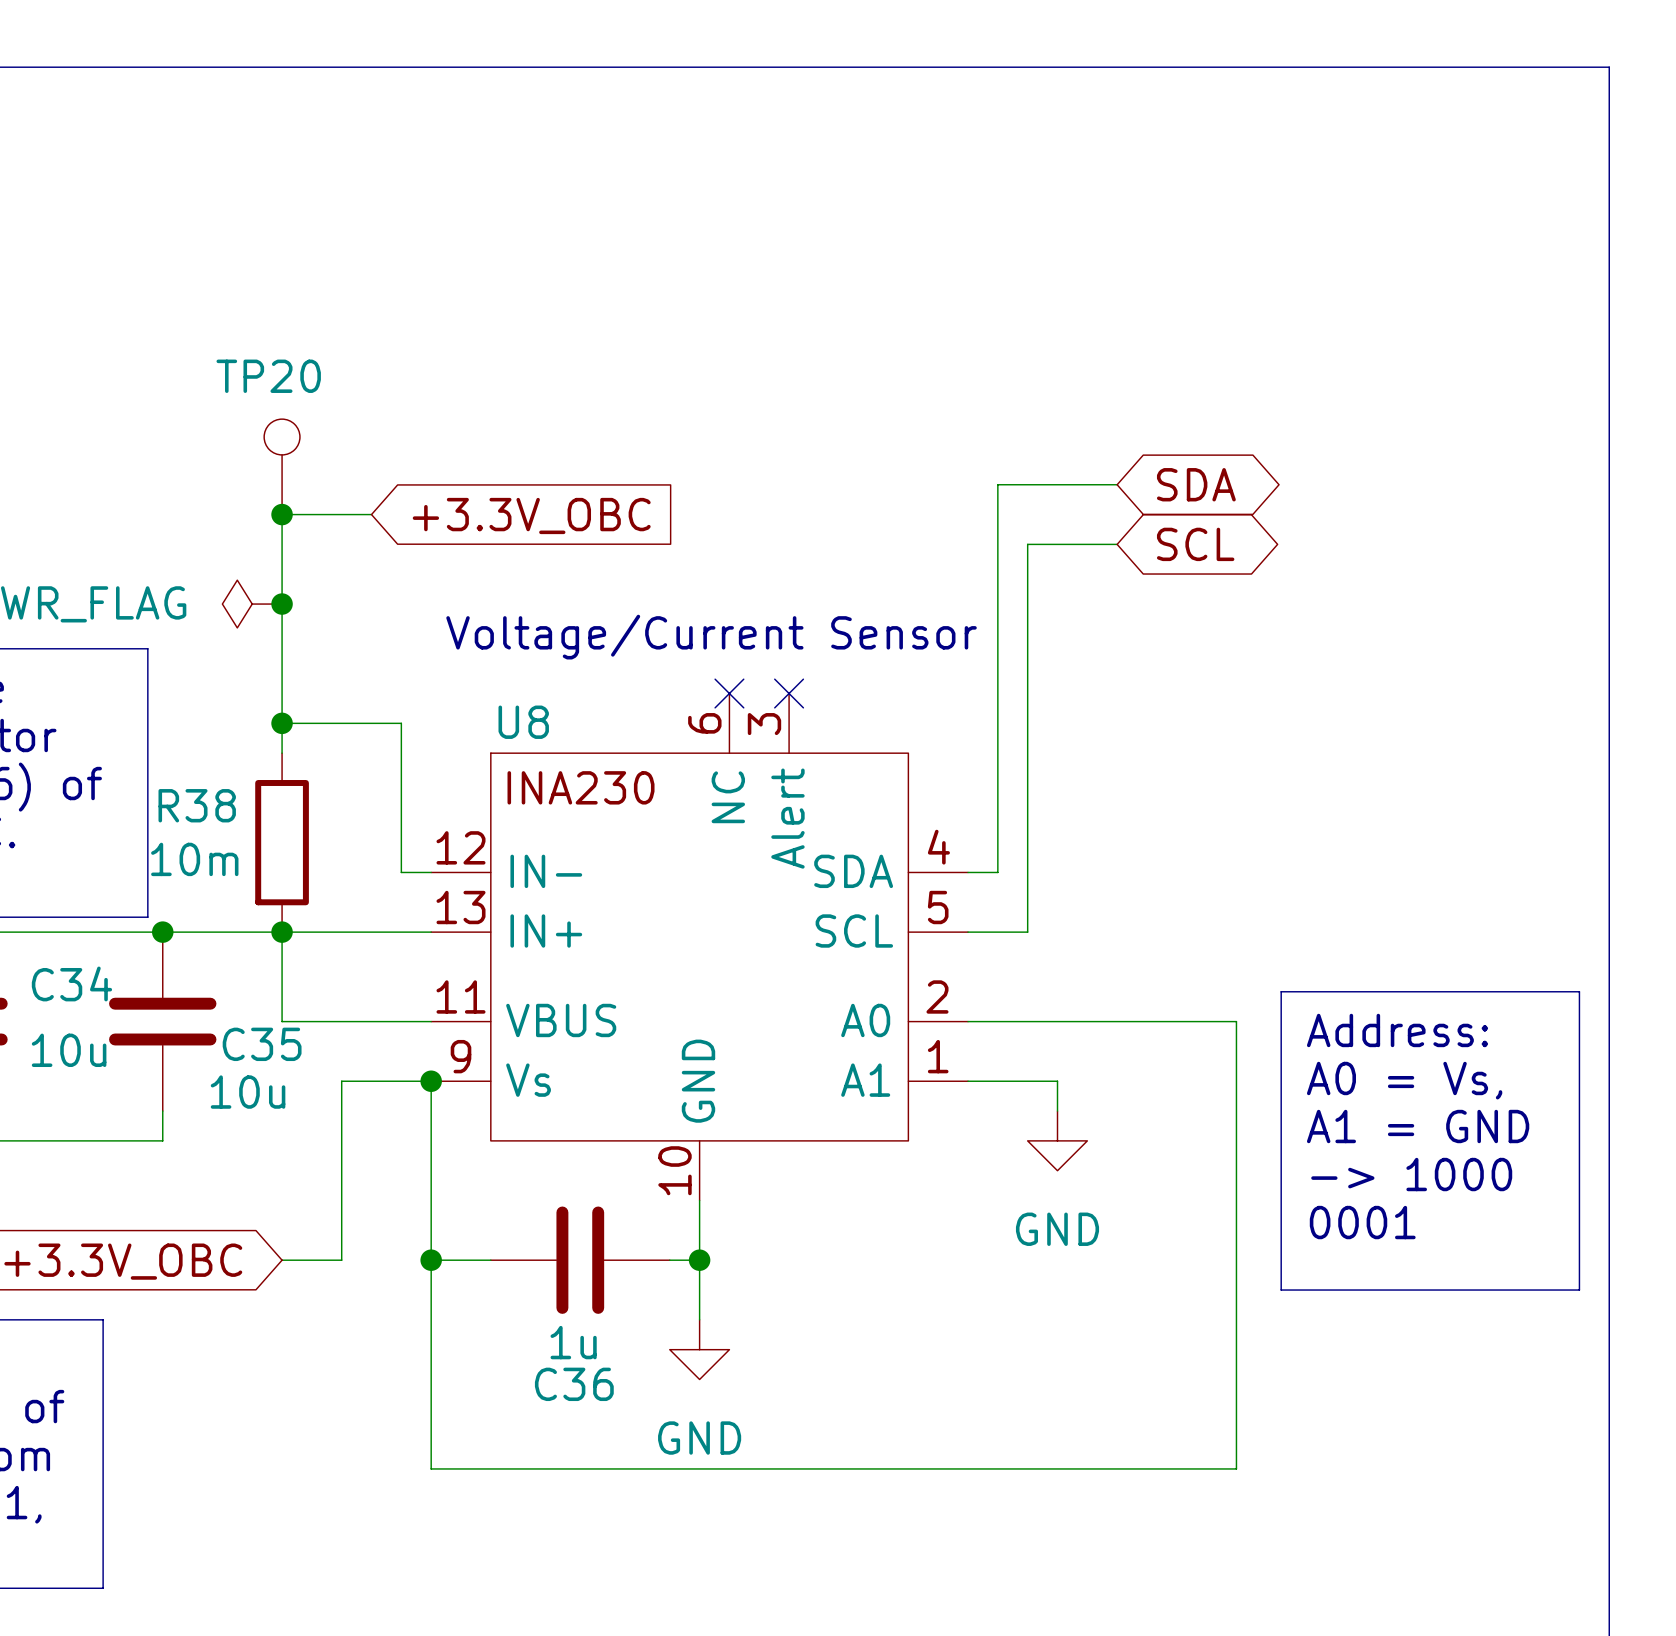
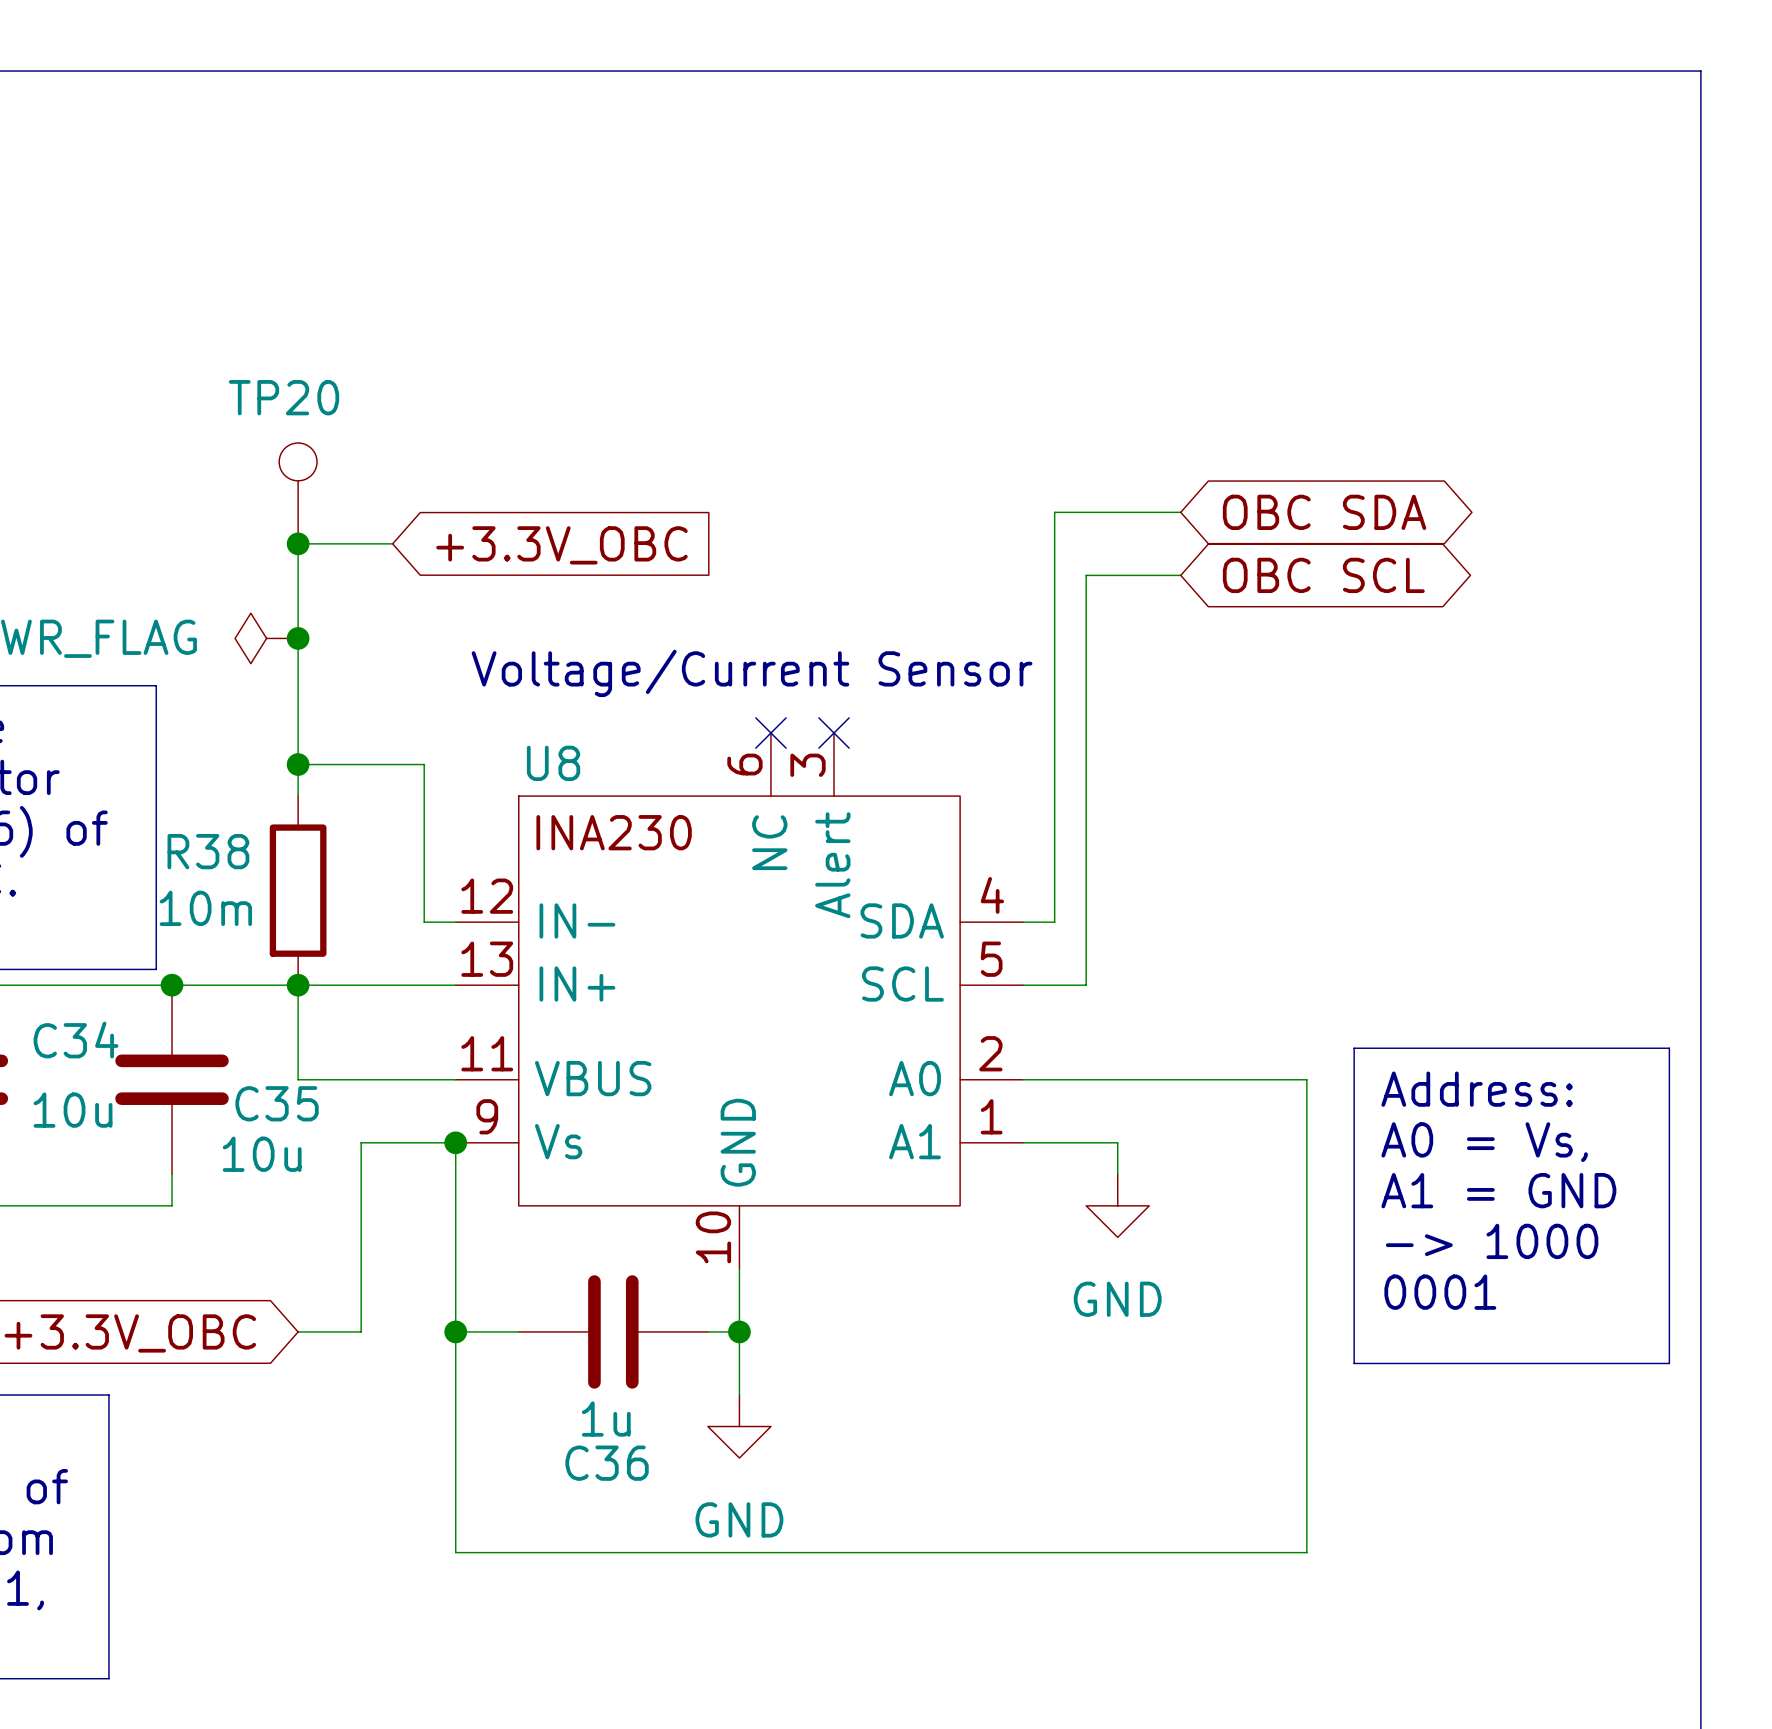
global label: SDA (1196, 484) -> OBC SDA (1324, 512)
global label: SCL (1195, 544) -> OBC SCL (1323, 575)

